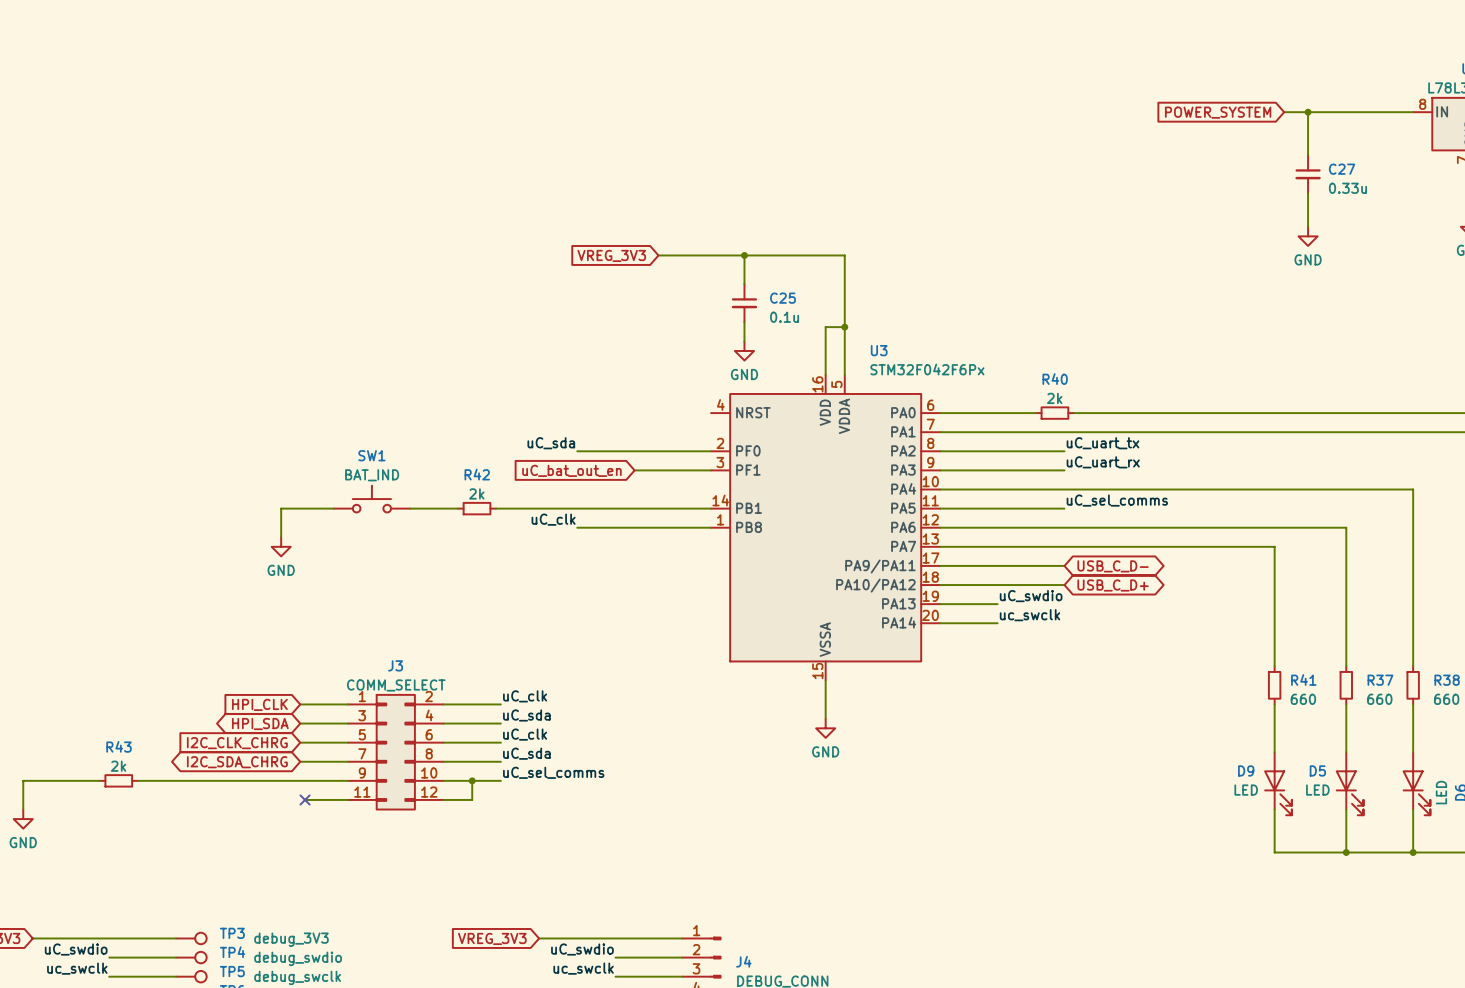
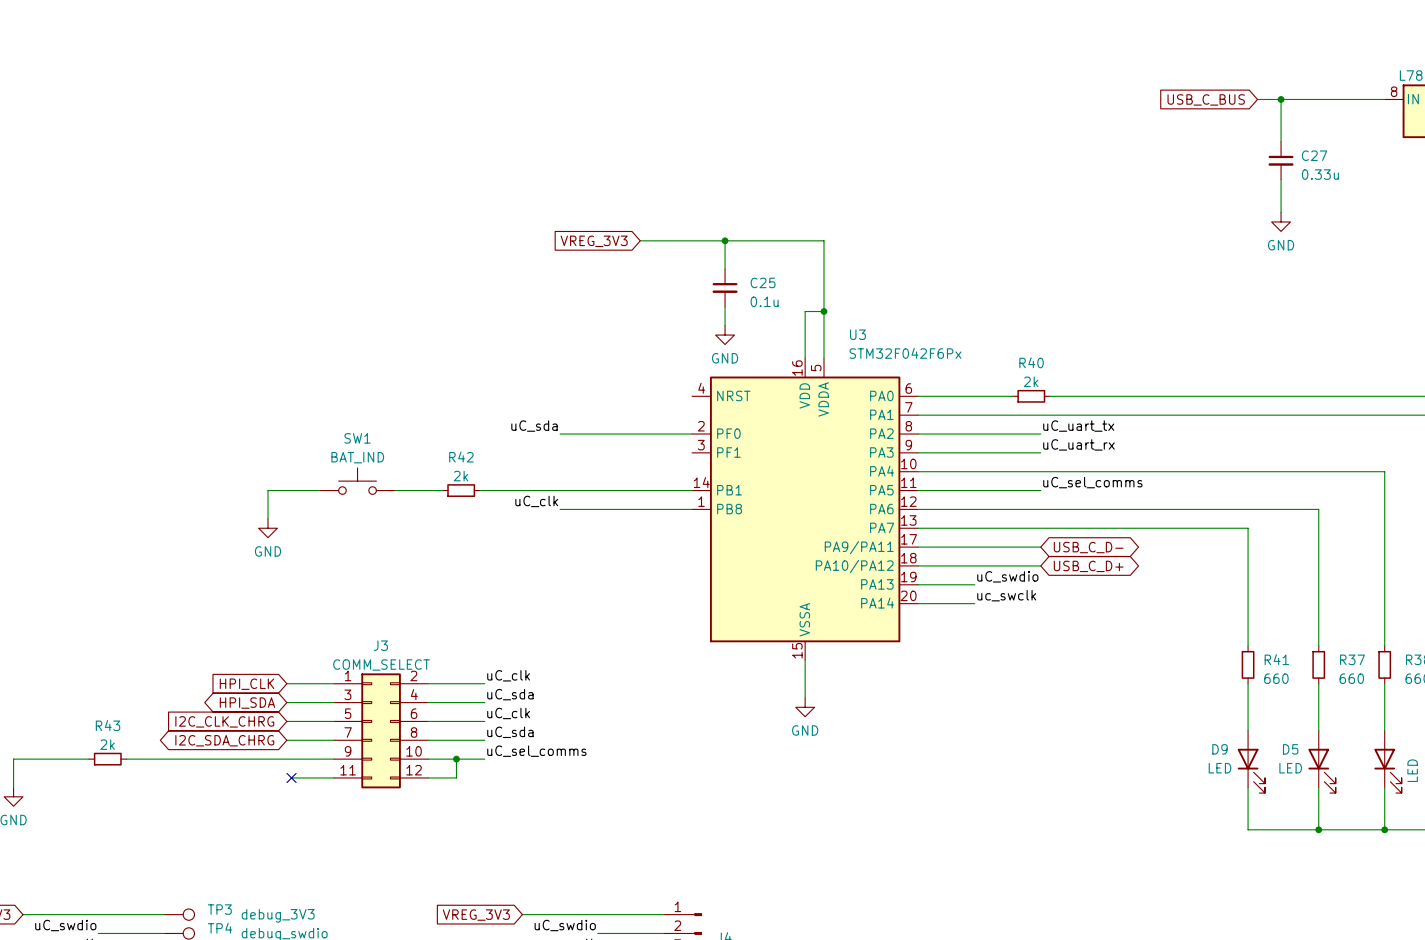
global label: POWER_SYSTEM (1218, 112) -> USB_C_BUS (1206, 99)
global label: uC_bat_out_en (571, 470) -> none
wire: (634, 470) (711, 470) -> none

